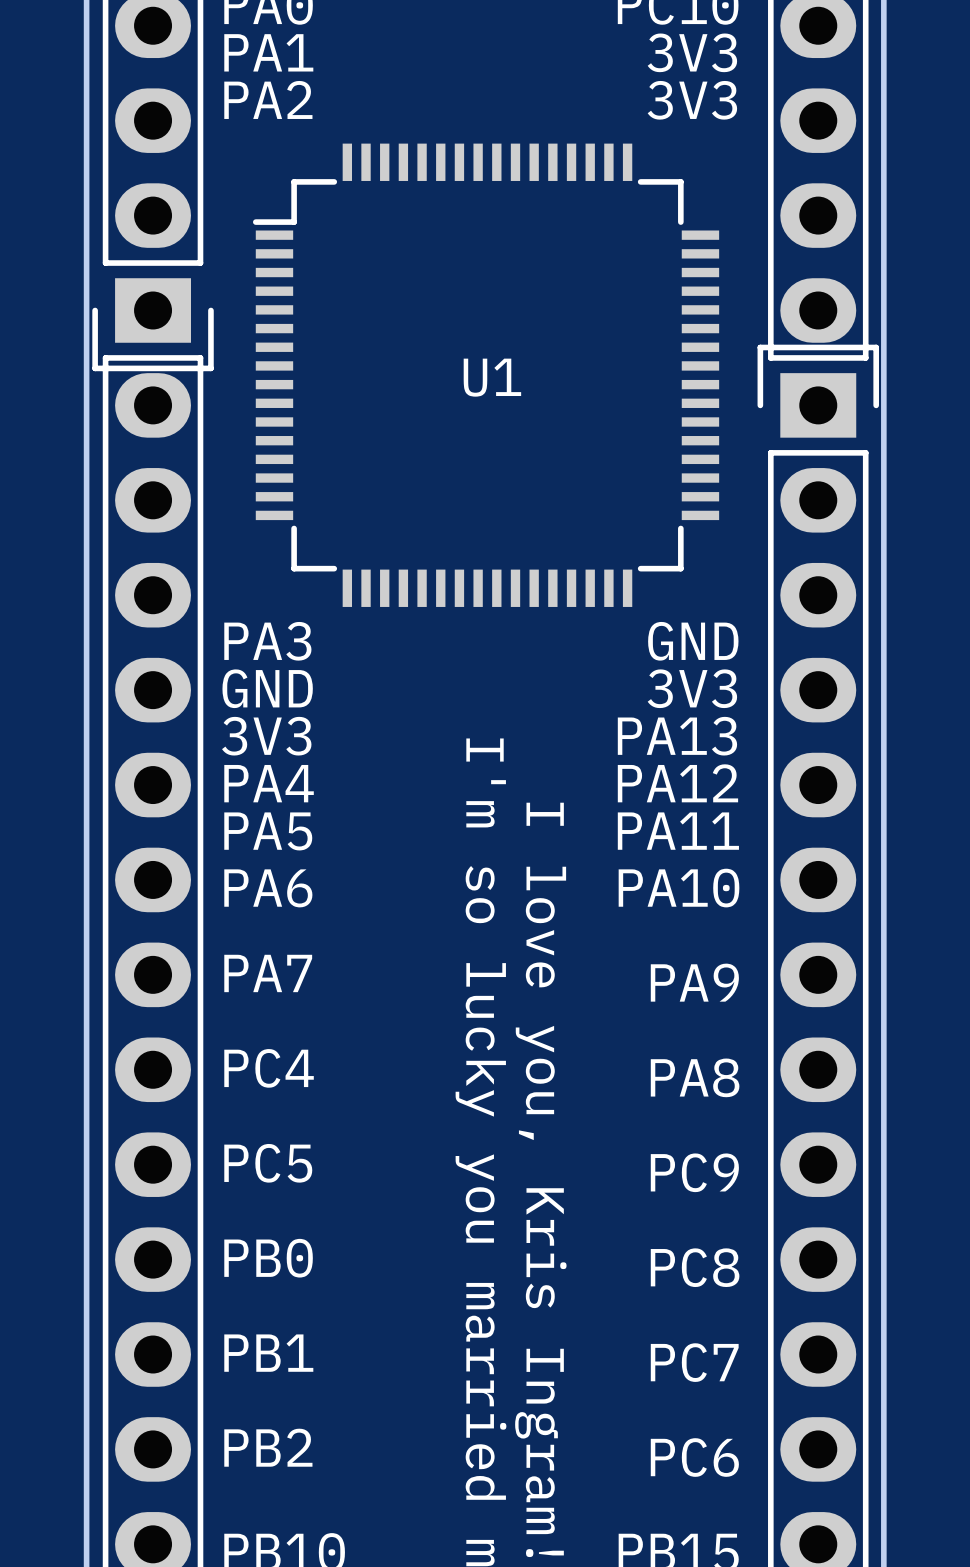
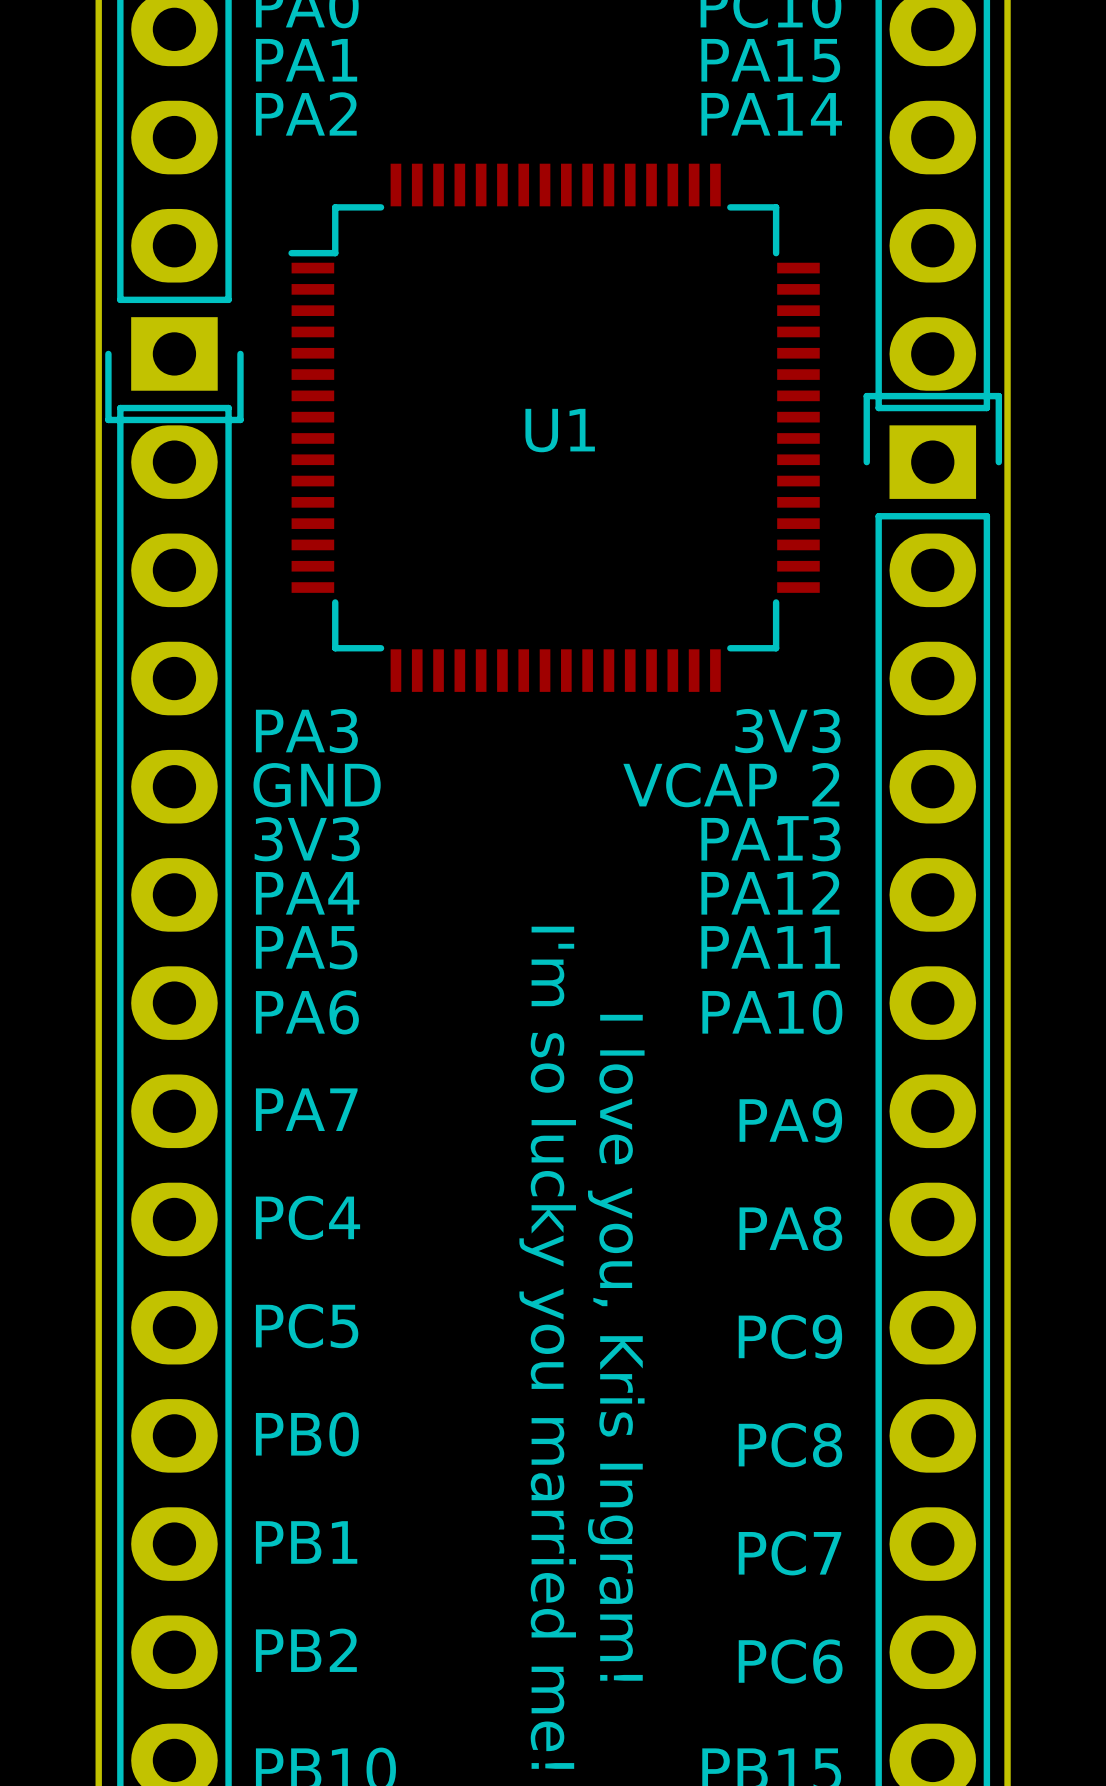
text: 3V3 (692, 52) -> PA15 (770, 60)
text: 3V3 (692, 100) -> PA14 (771, 114)
text: GND (693, 641) -> 3V3 (787, 731)
text: 3V3 (692, 688) -> VCAP_2 (731, 791)

